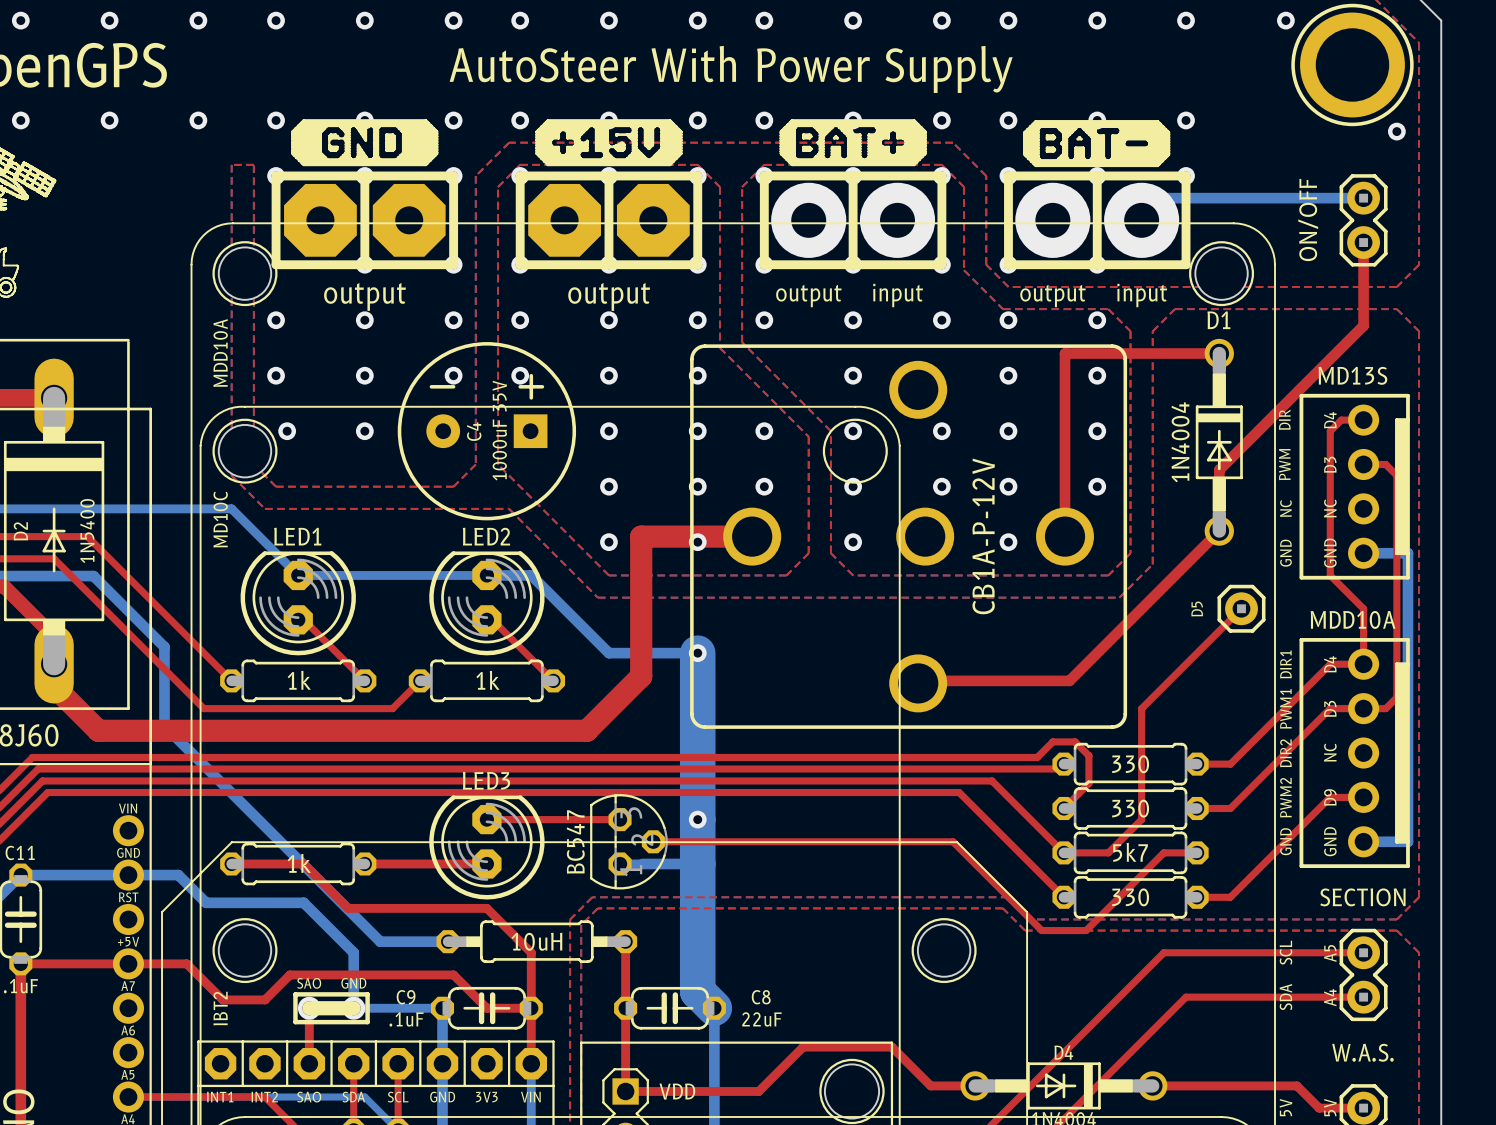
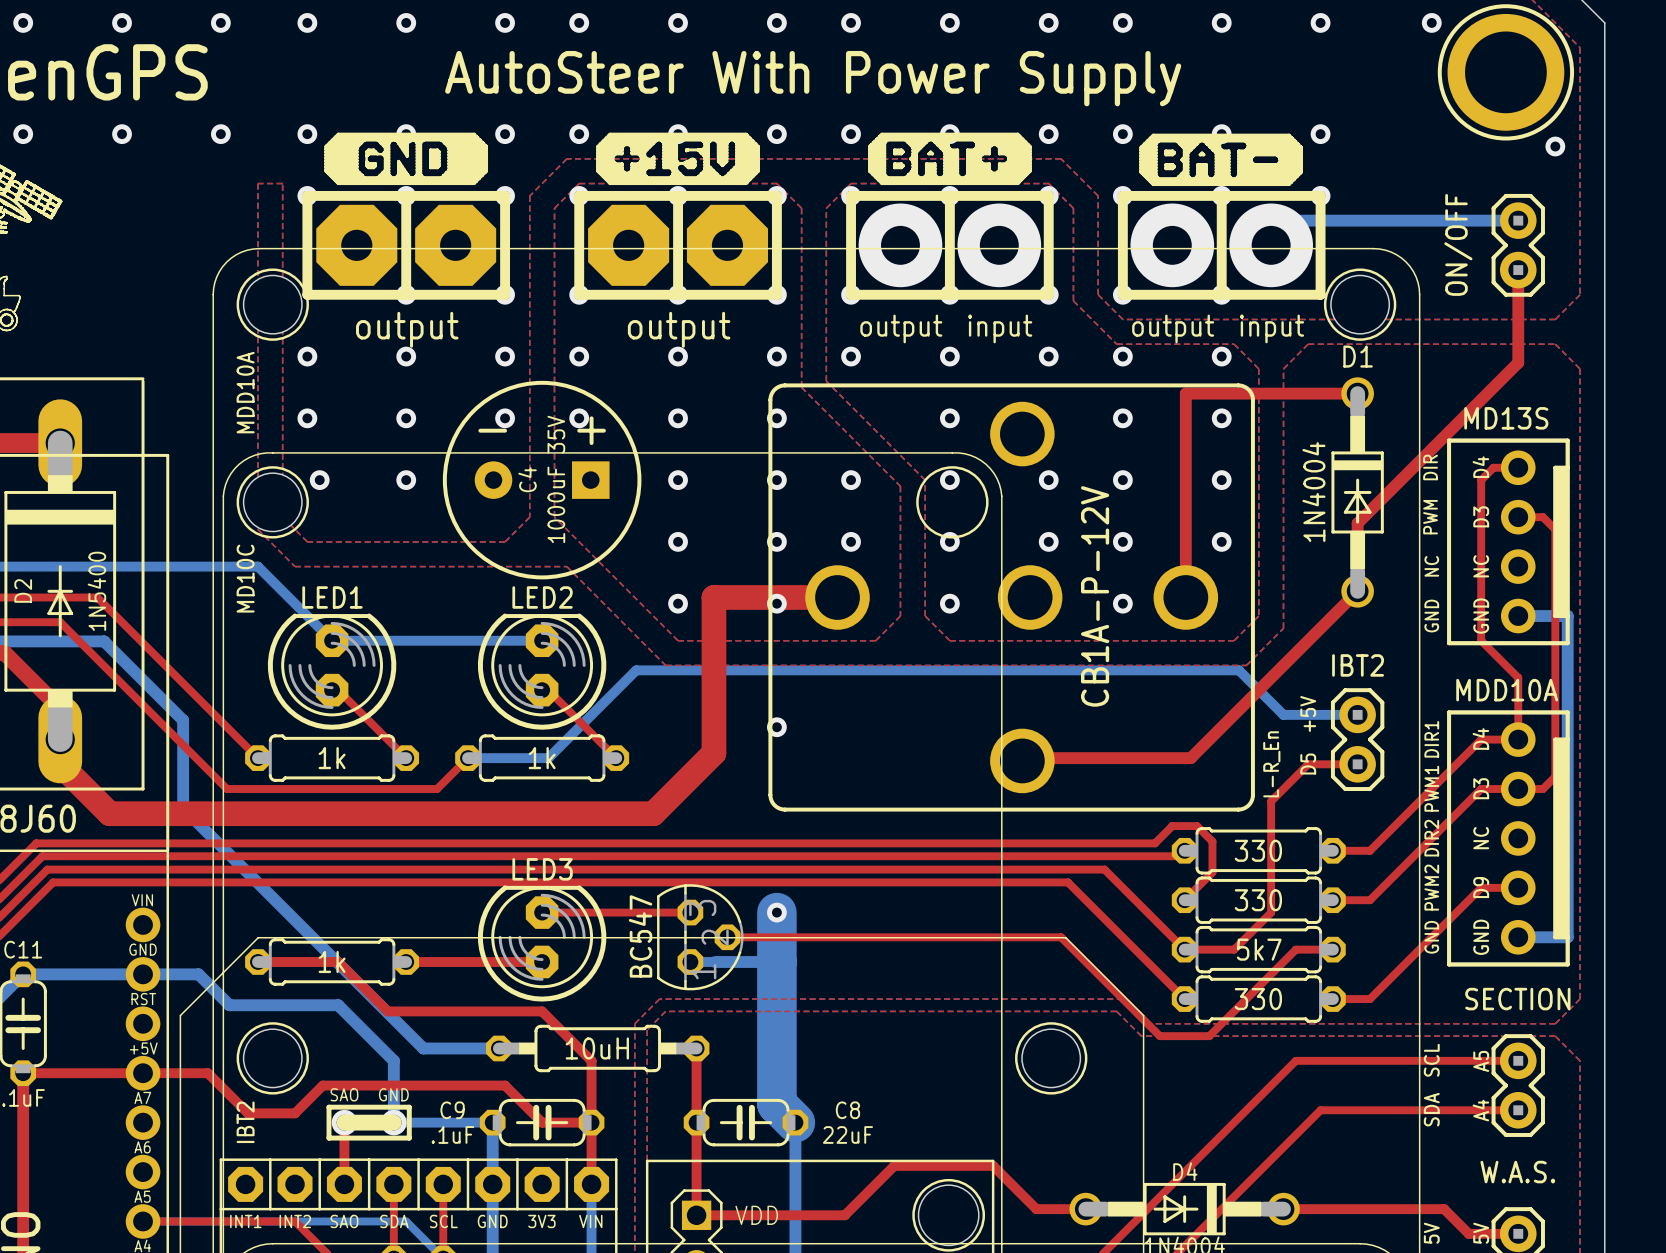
bottom track: (486, 575) (531, 575) (608, 653) (697, 653) (697, 819) -> none
D5 footprint: [1217, 584, 1266, 633] -> [1330, 688, 1385, 791]
text: none -> IBT2 (1358, 665)
top track: (1241, 608) (1141, 708) (1141, 719) -> (1357, 764) (1308, 764) (1271, 801)
text: none -> +5V (1308, 713)
bottom track: none -> (1357, 714) (1283, 714) (1238, 670) (636, 670) (548, 758) (468, 758)
text: none -> L-R_En (1271, 764)

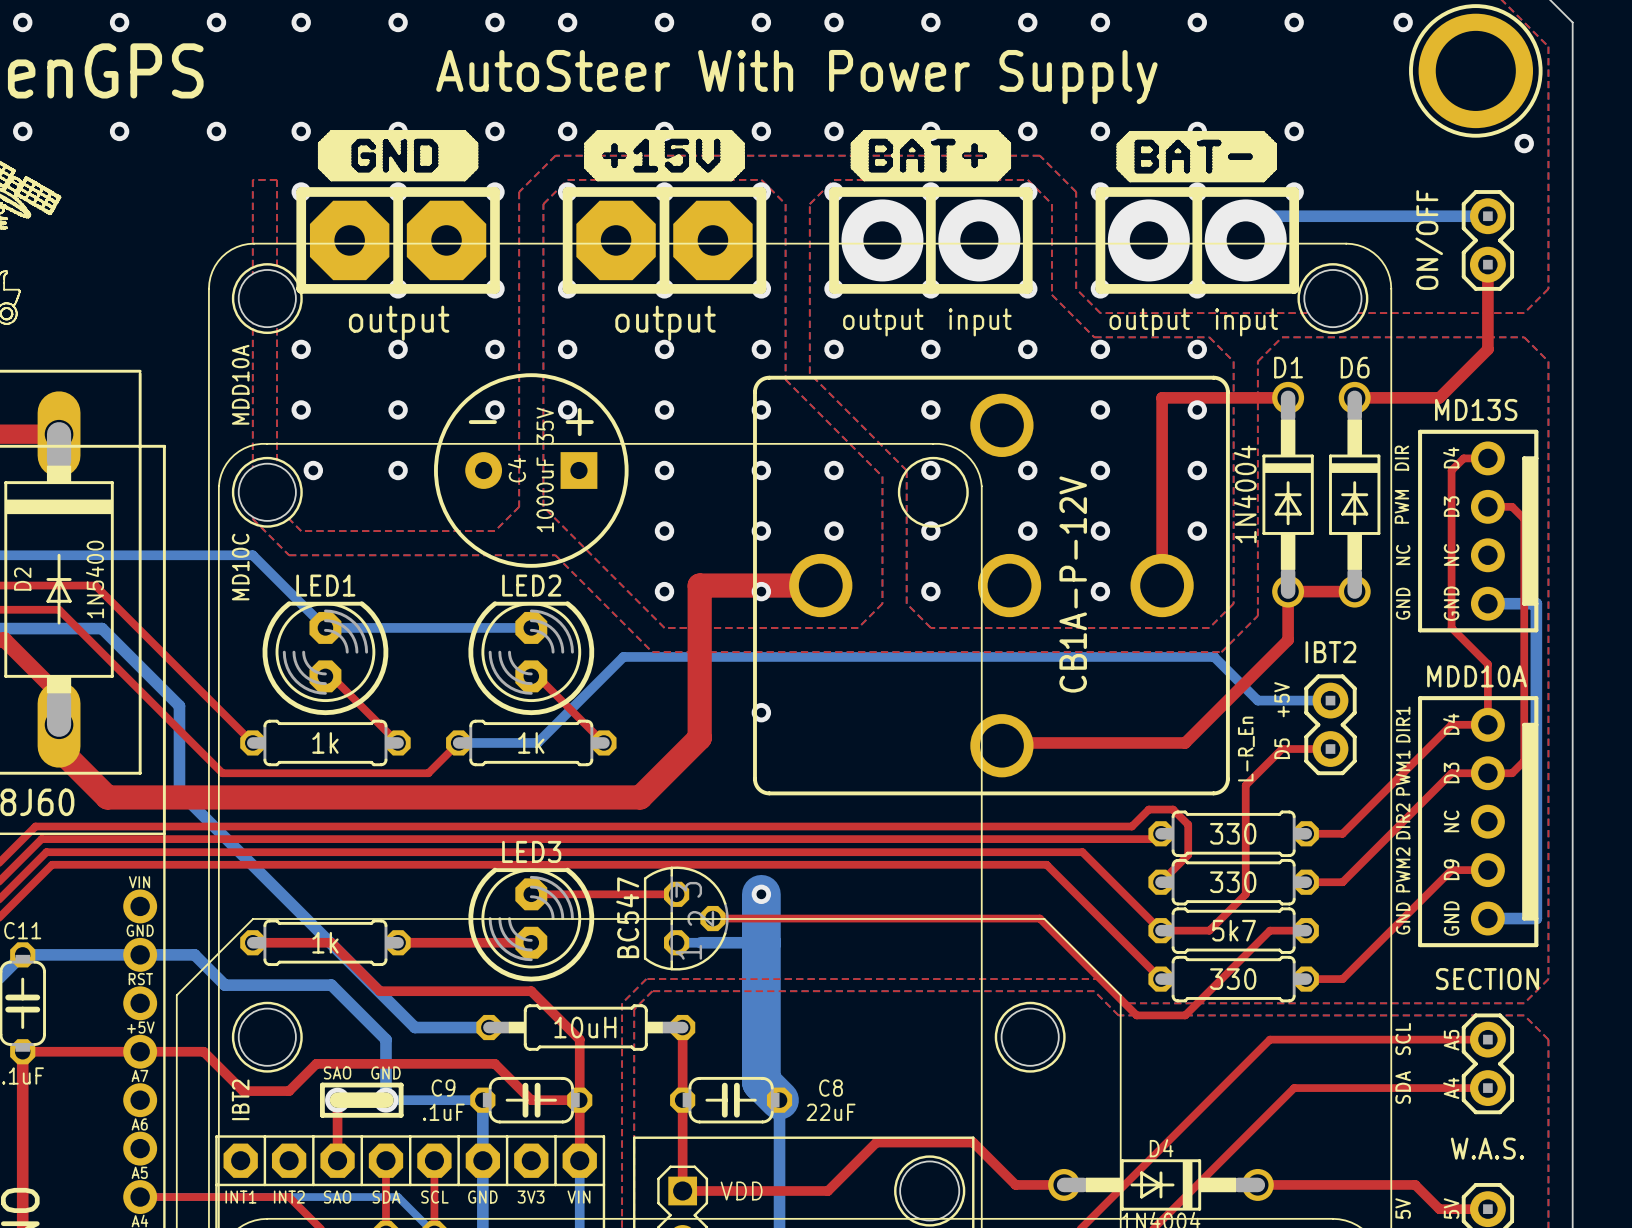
D1 name position: D1 (1358, 356) -> D1 (1288, 367)
top track: (1518, 356) (1518, 362) (1357, 523) (1357, 591) (1190, 758) -> (1354, 591) (1288, 591) (1288, 640) (1185, 742) (1167, 742)
top track: none -> (1487, 349) (1439, 397) (1354, 397)
top track: (1357, 393) (1185, 393) (1185, 405) -> (1288, 397) (1162, 397)
D1 position: (1357, 492) -> (1288, 494)
D6: none -> (1354, 494)

